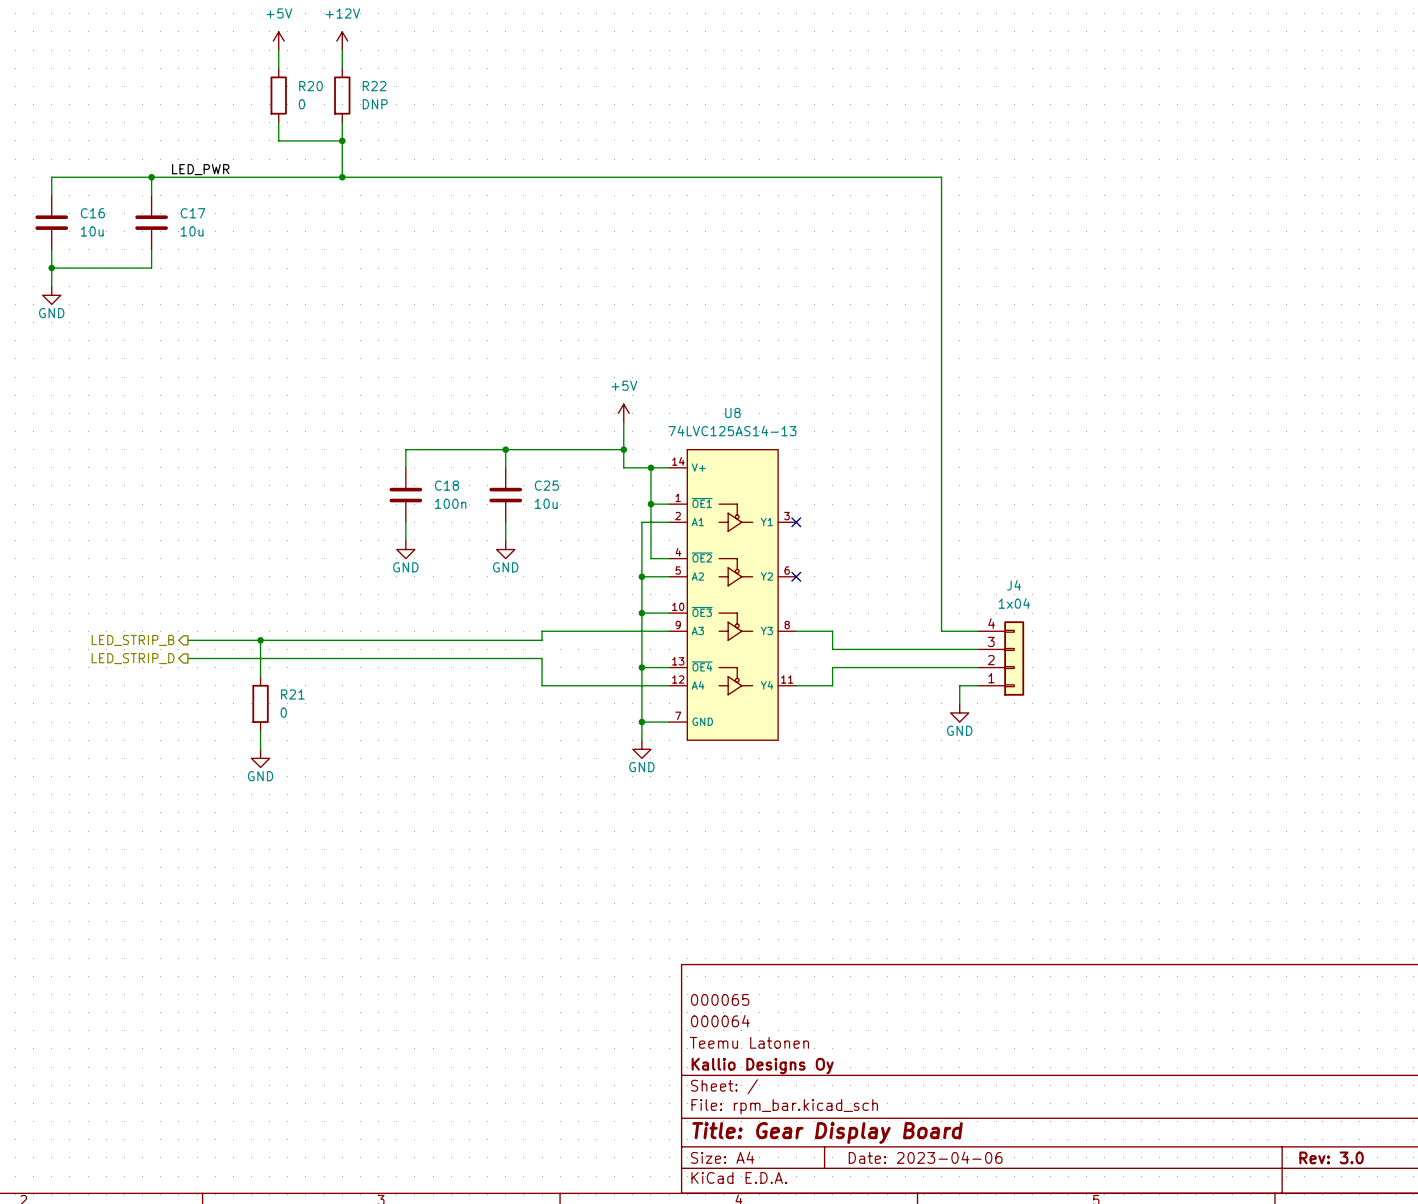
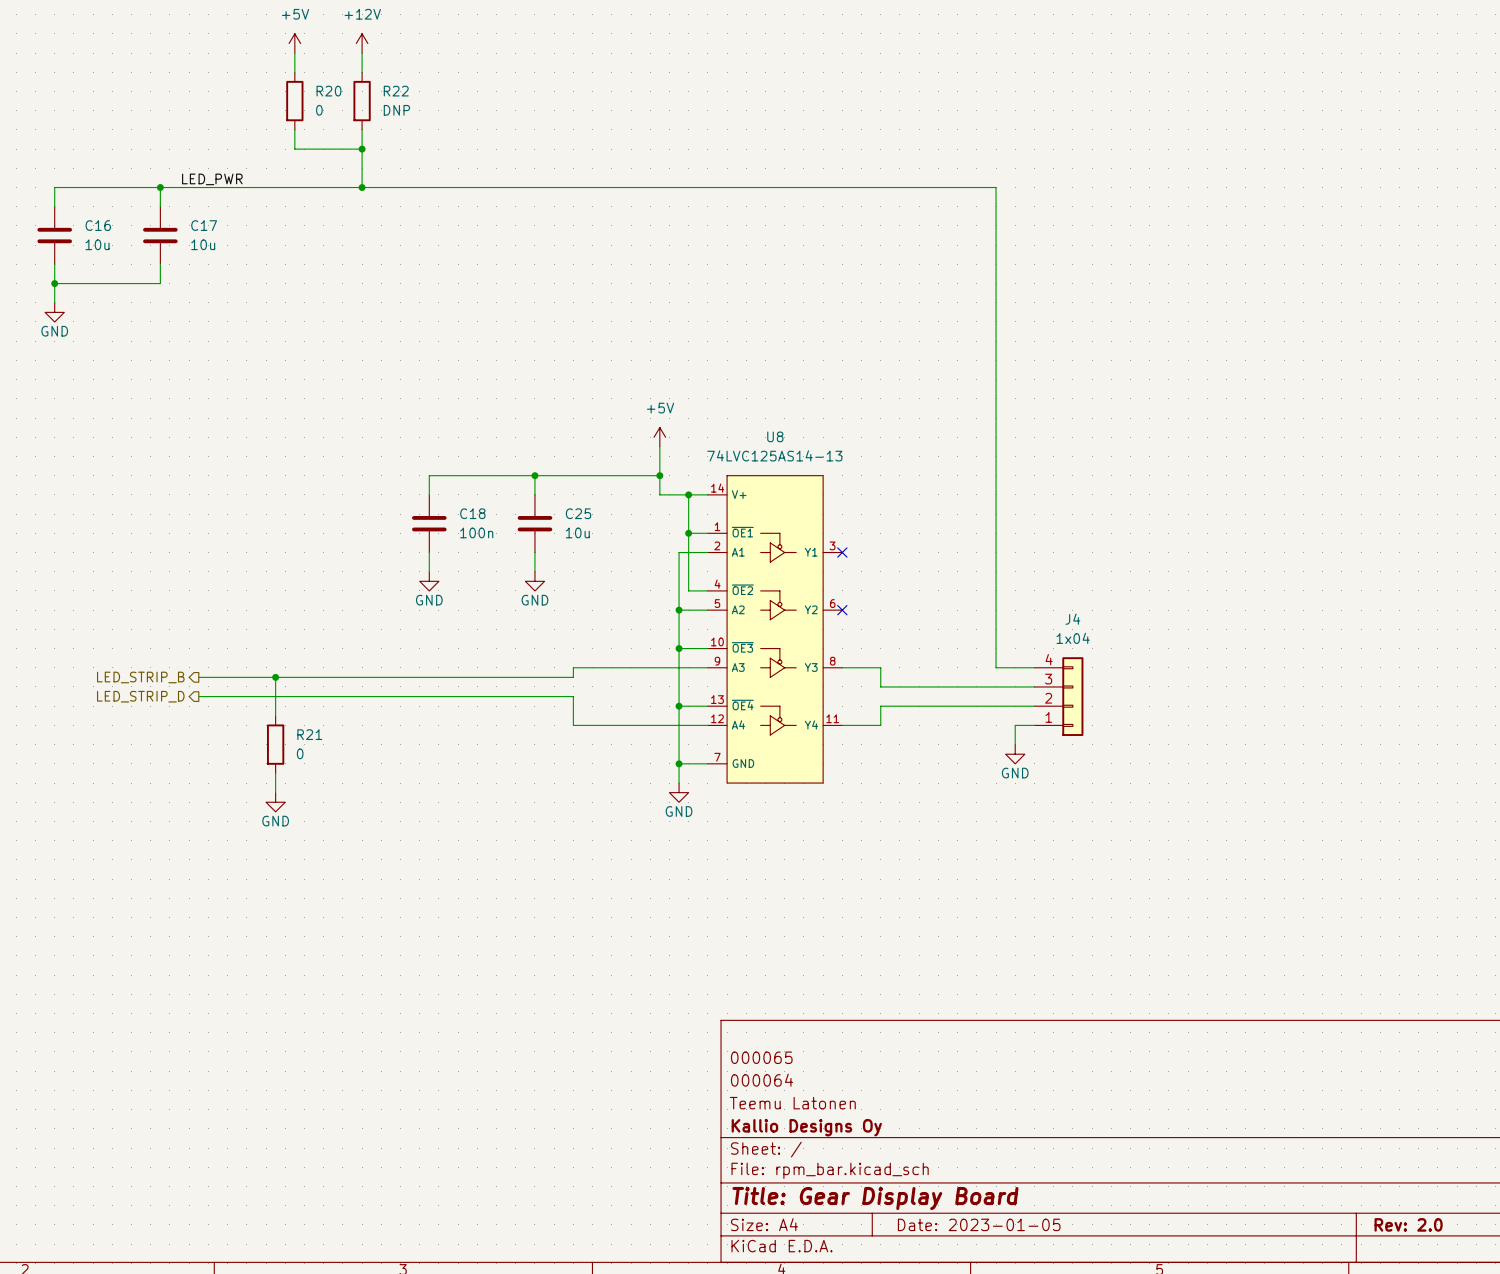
title block: Date: 2023-04-06 (925, 1157) -> Date: 2023-01-05 (979, 1224)
title block: Rev: 3.0 (1331, 1157) -> Rev: 2.0 (1408, 1224)

